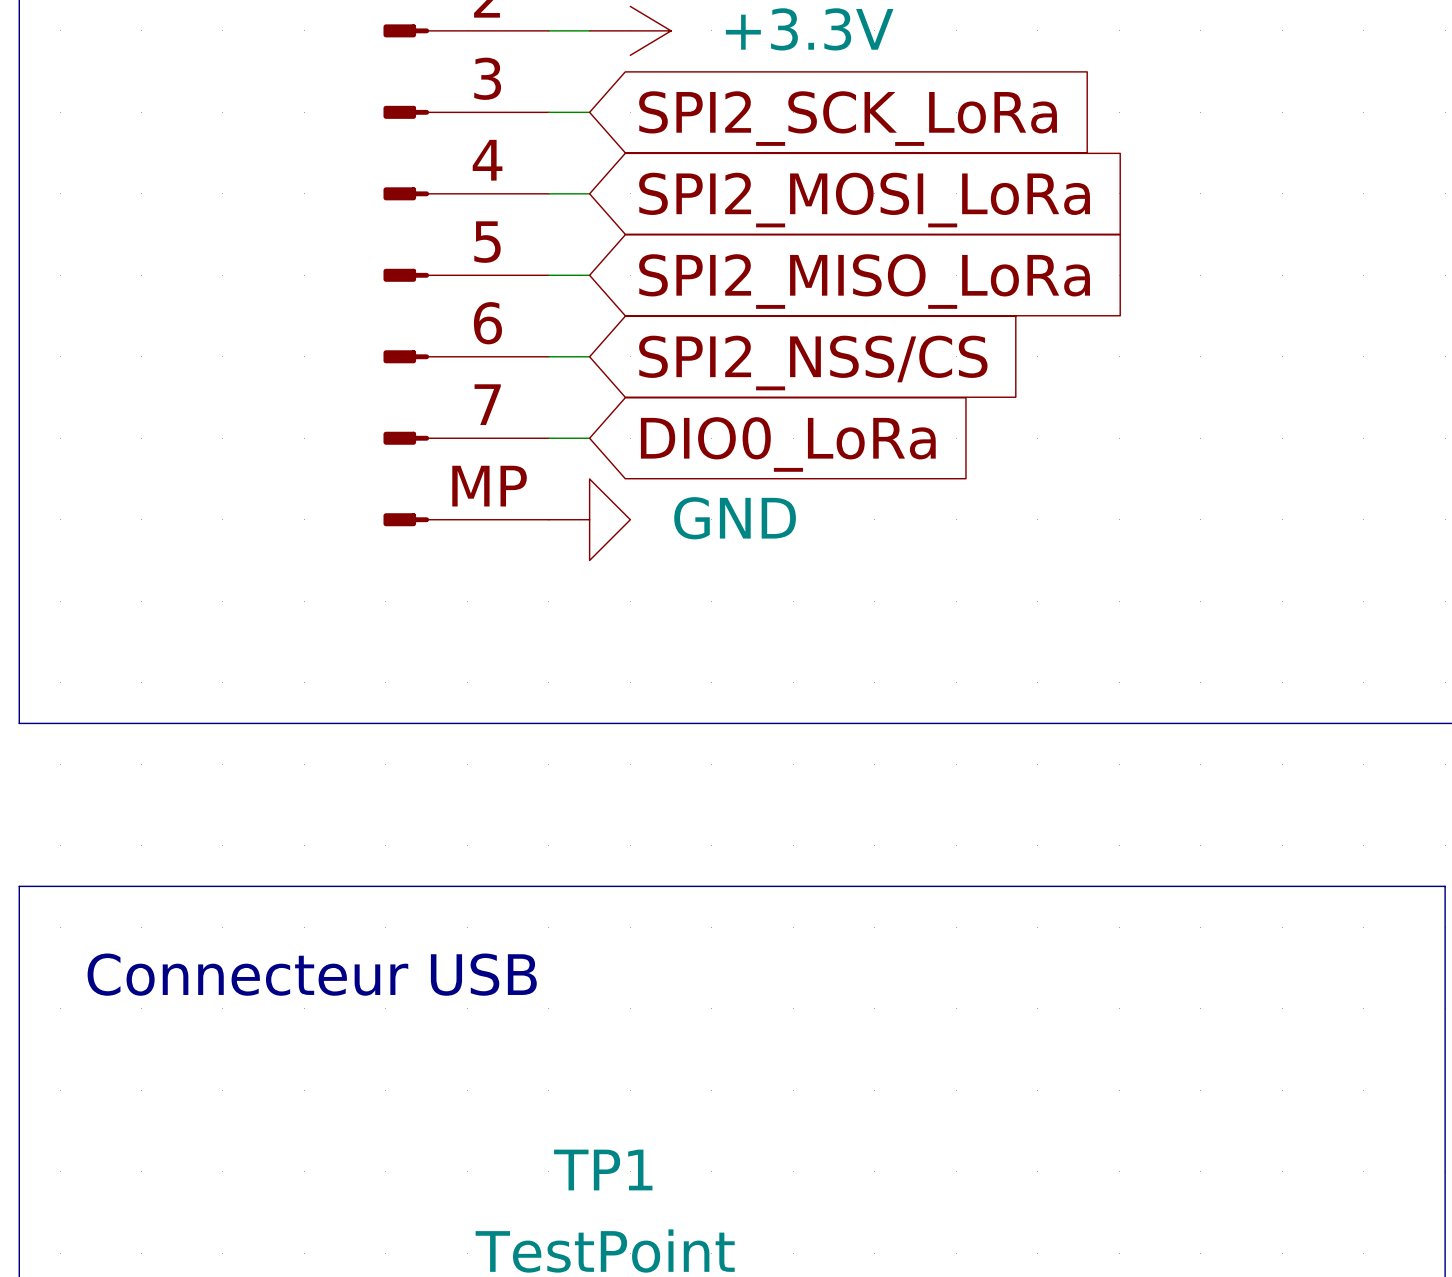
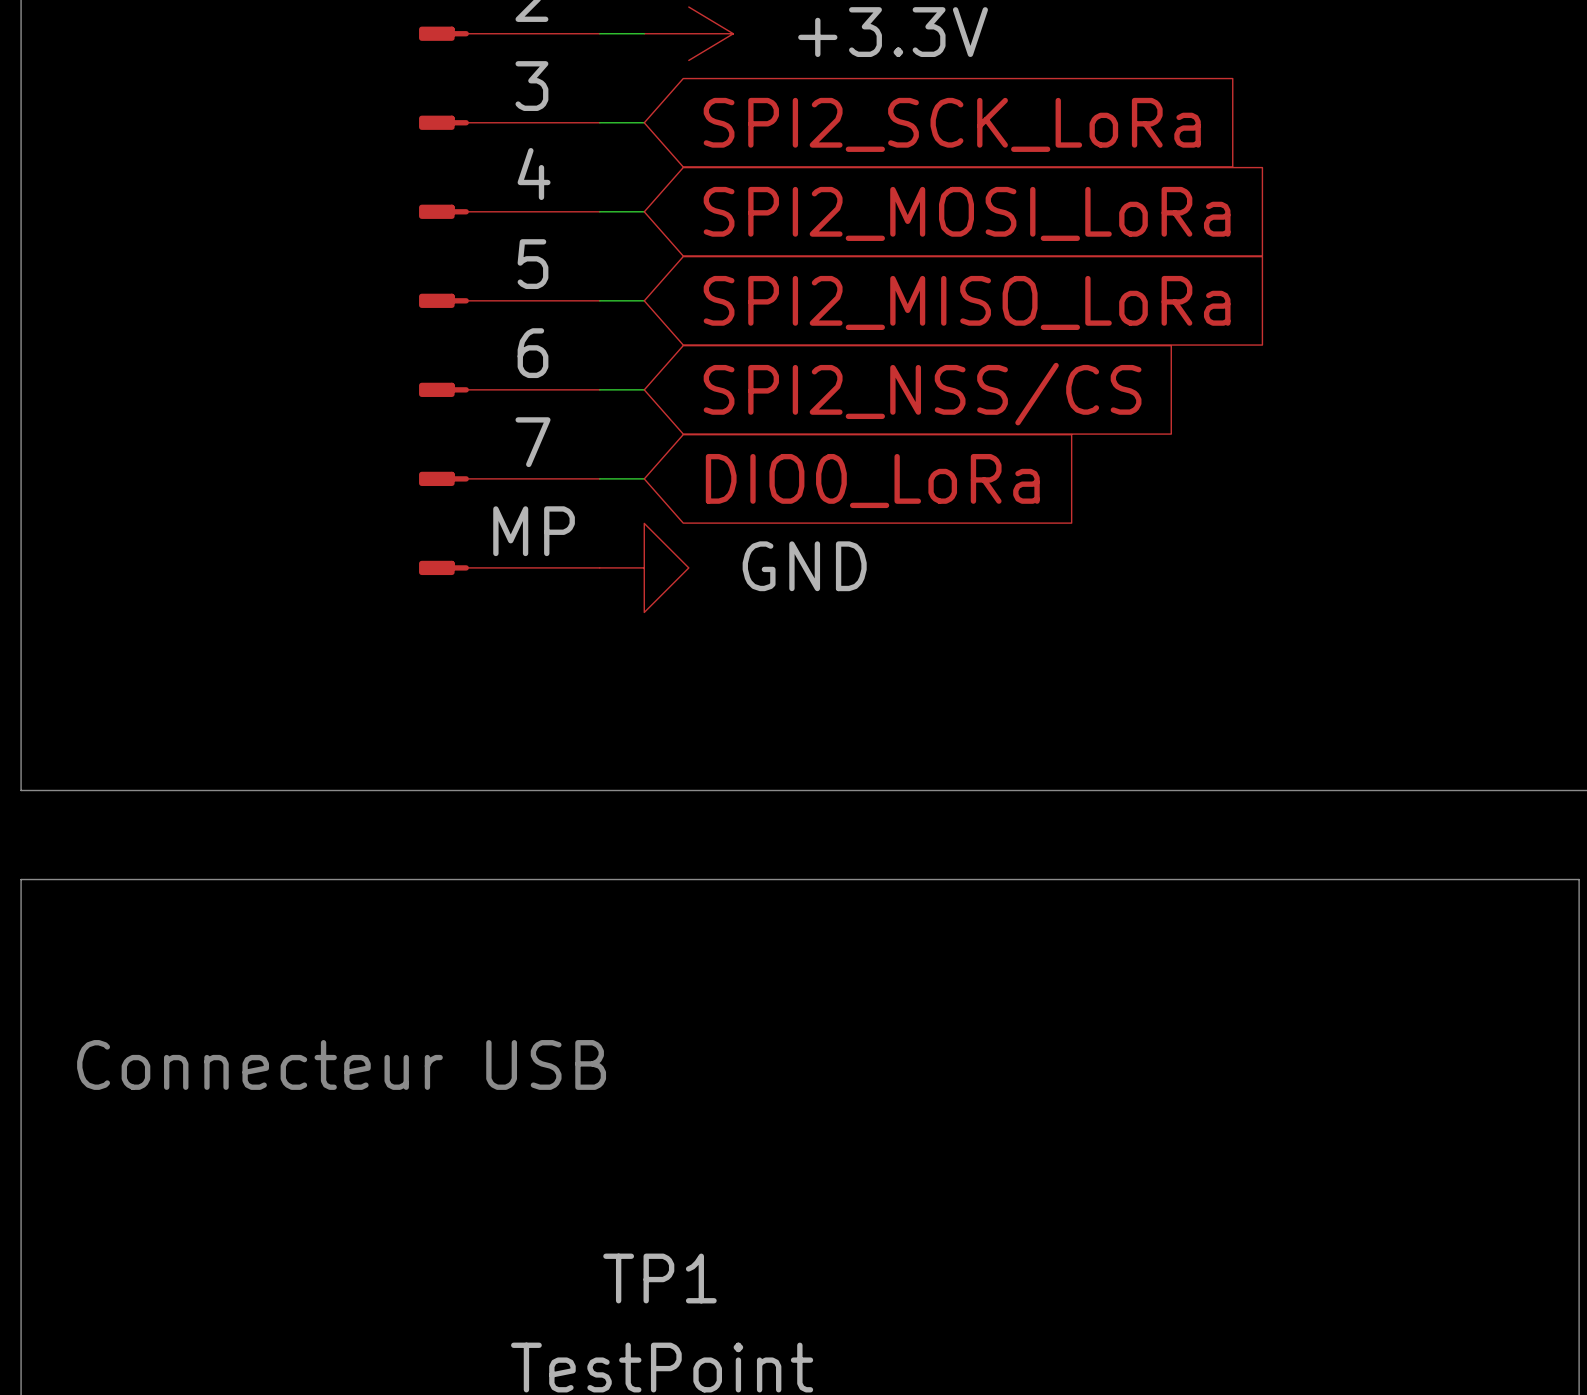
line: (19, 886) (1445, 886) -> (21, 968) (21, 879) (1579, 879) (1579, 968)

